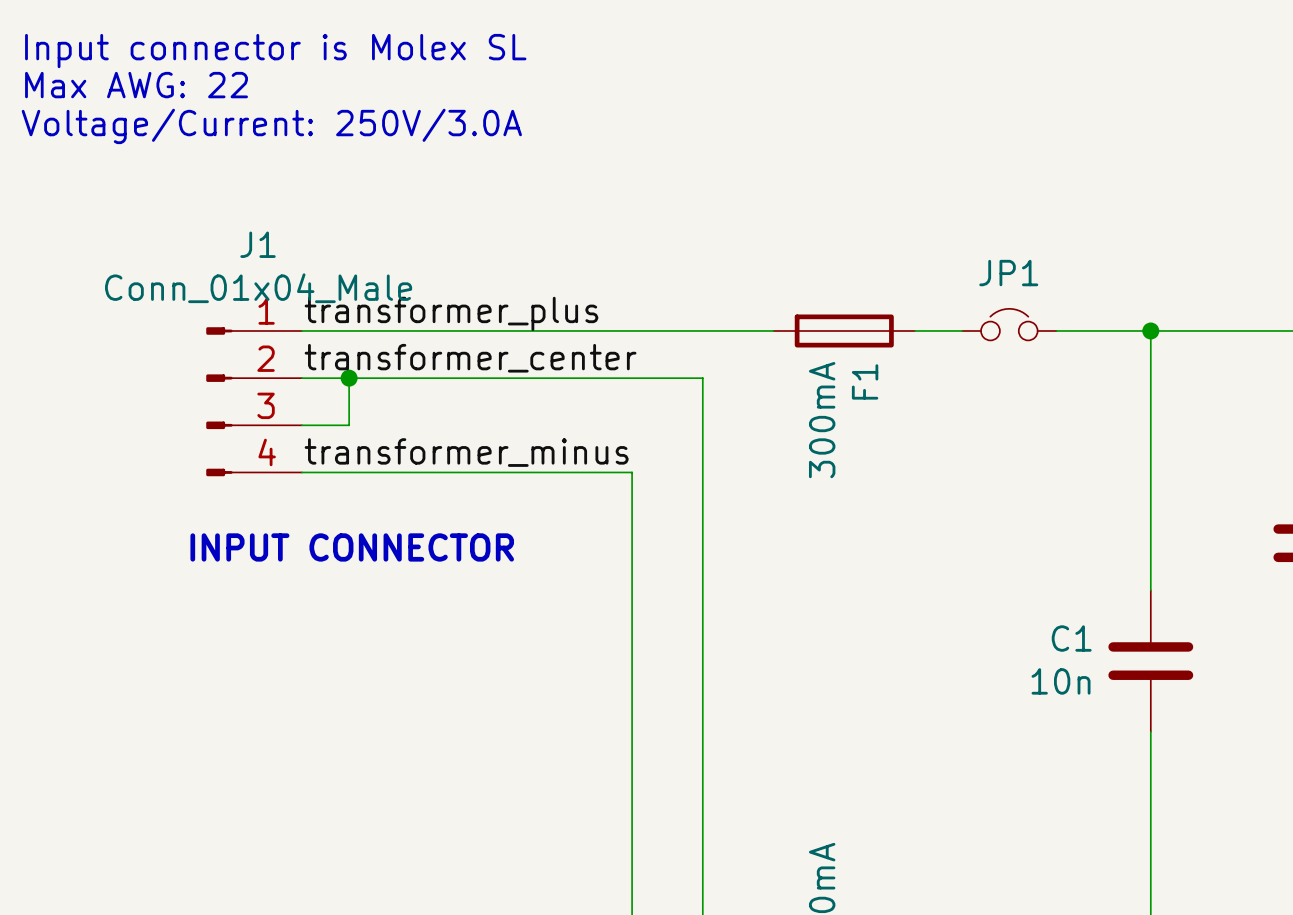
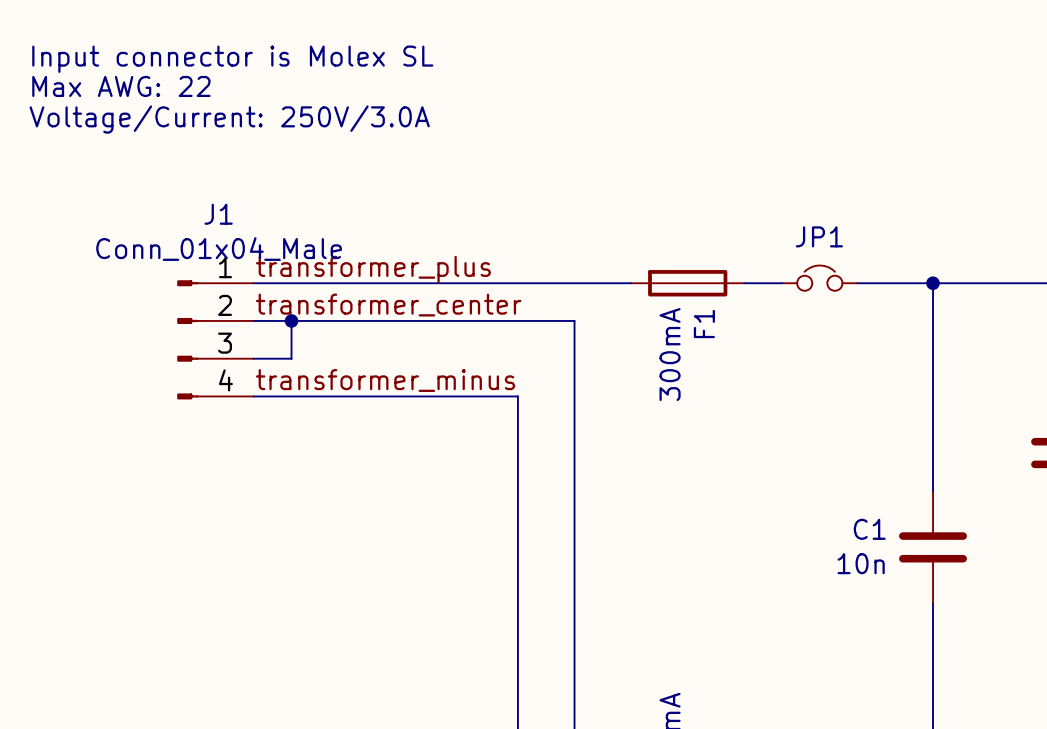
text: INPUT CONNECTOR (352, 547) -> none

